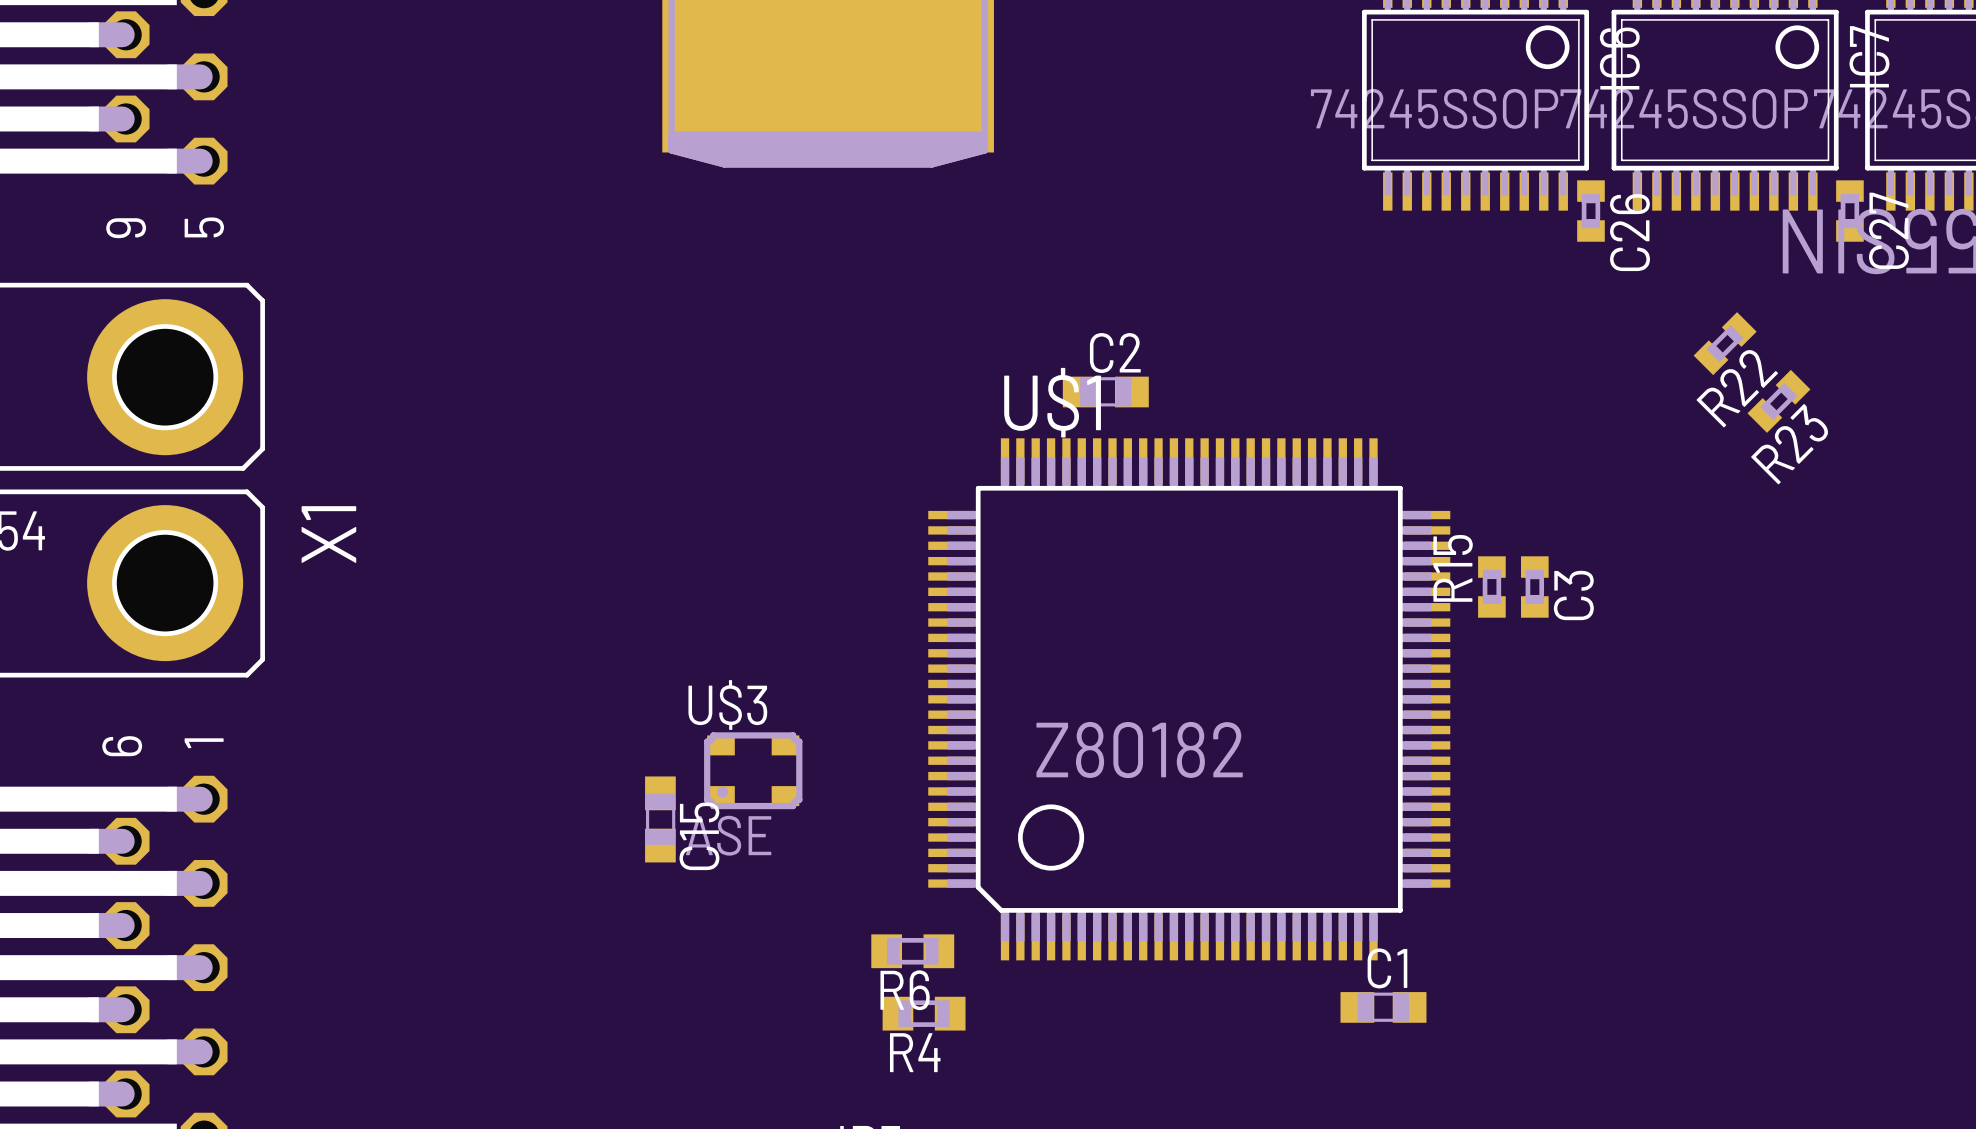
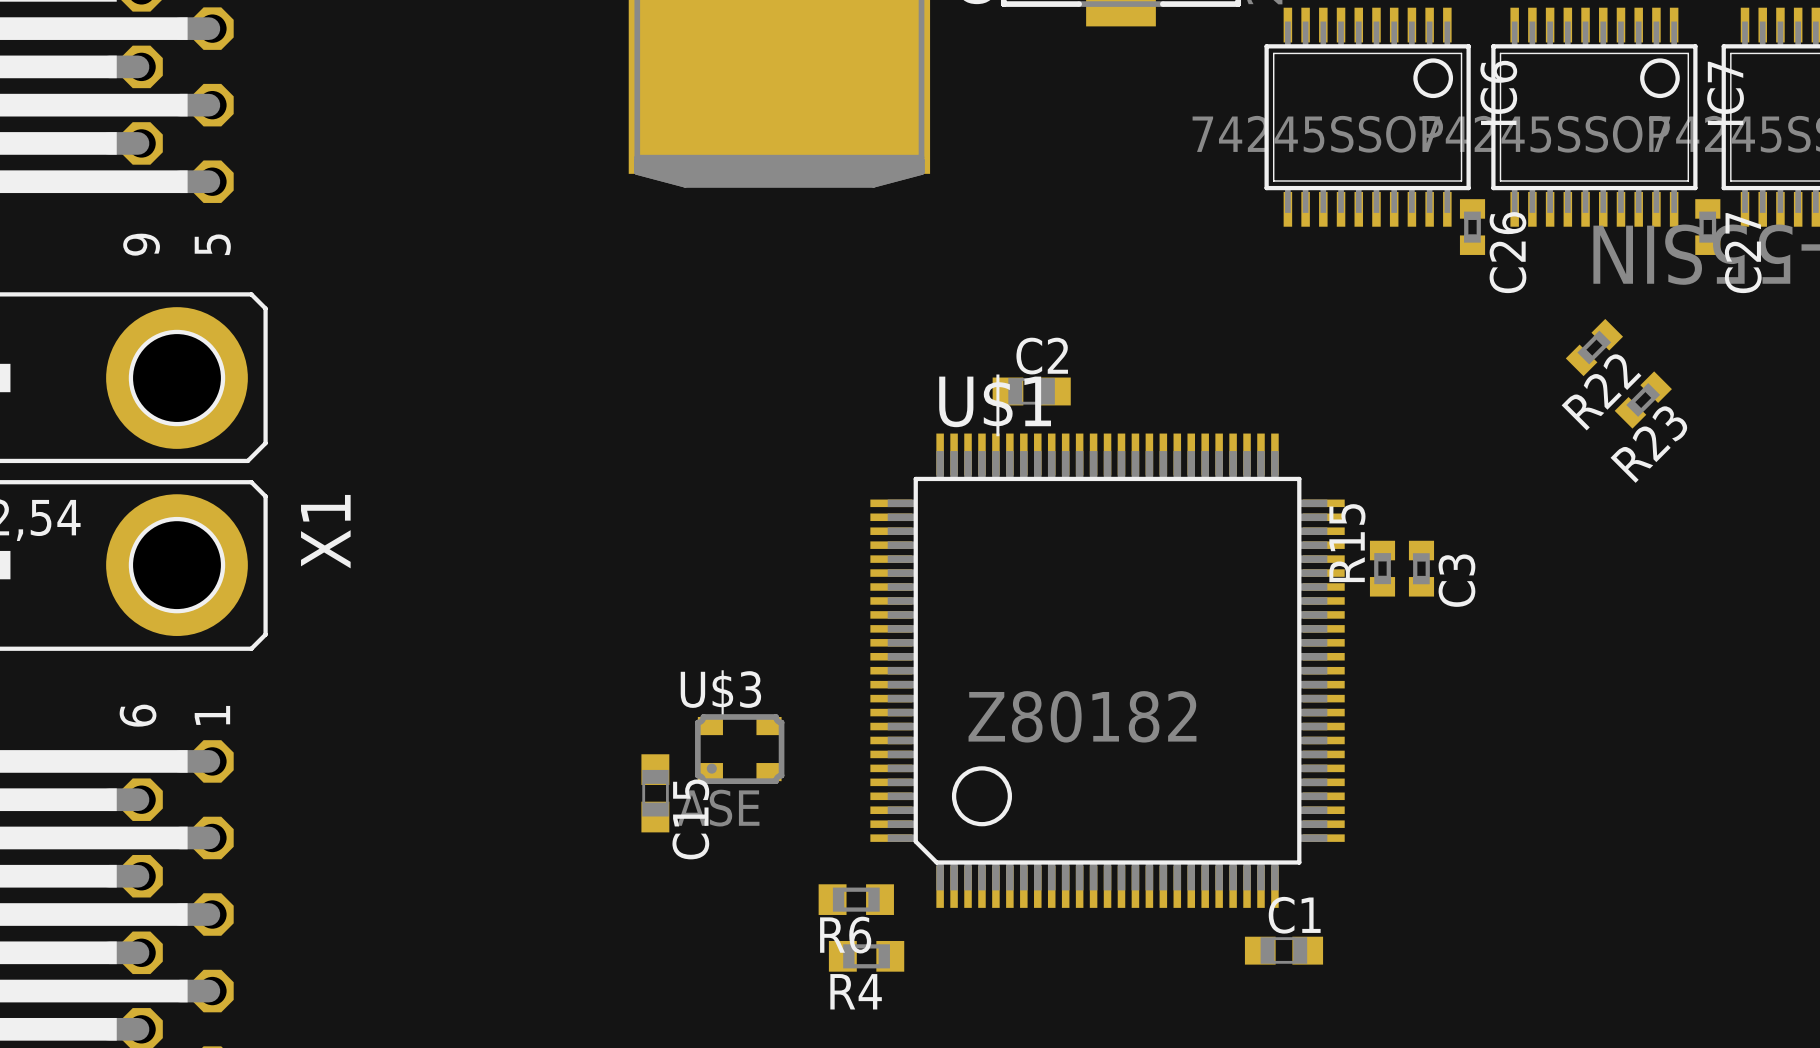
U$3 position: (753, 770) -> (739, 749)
C15 position: (660, 819) -> (655, 793)

